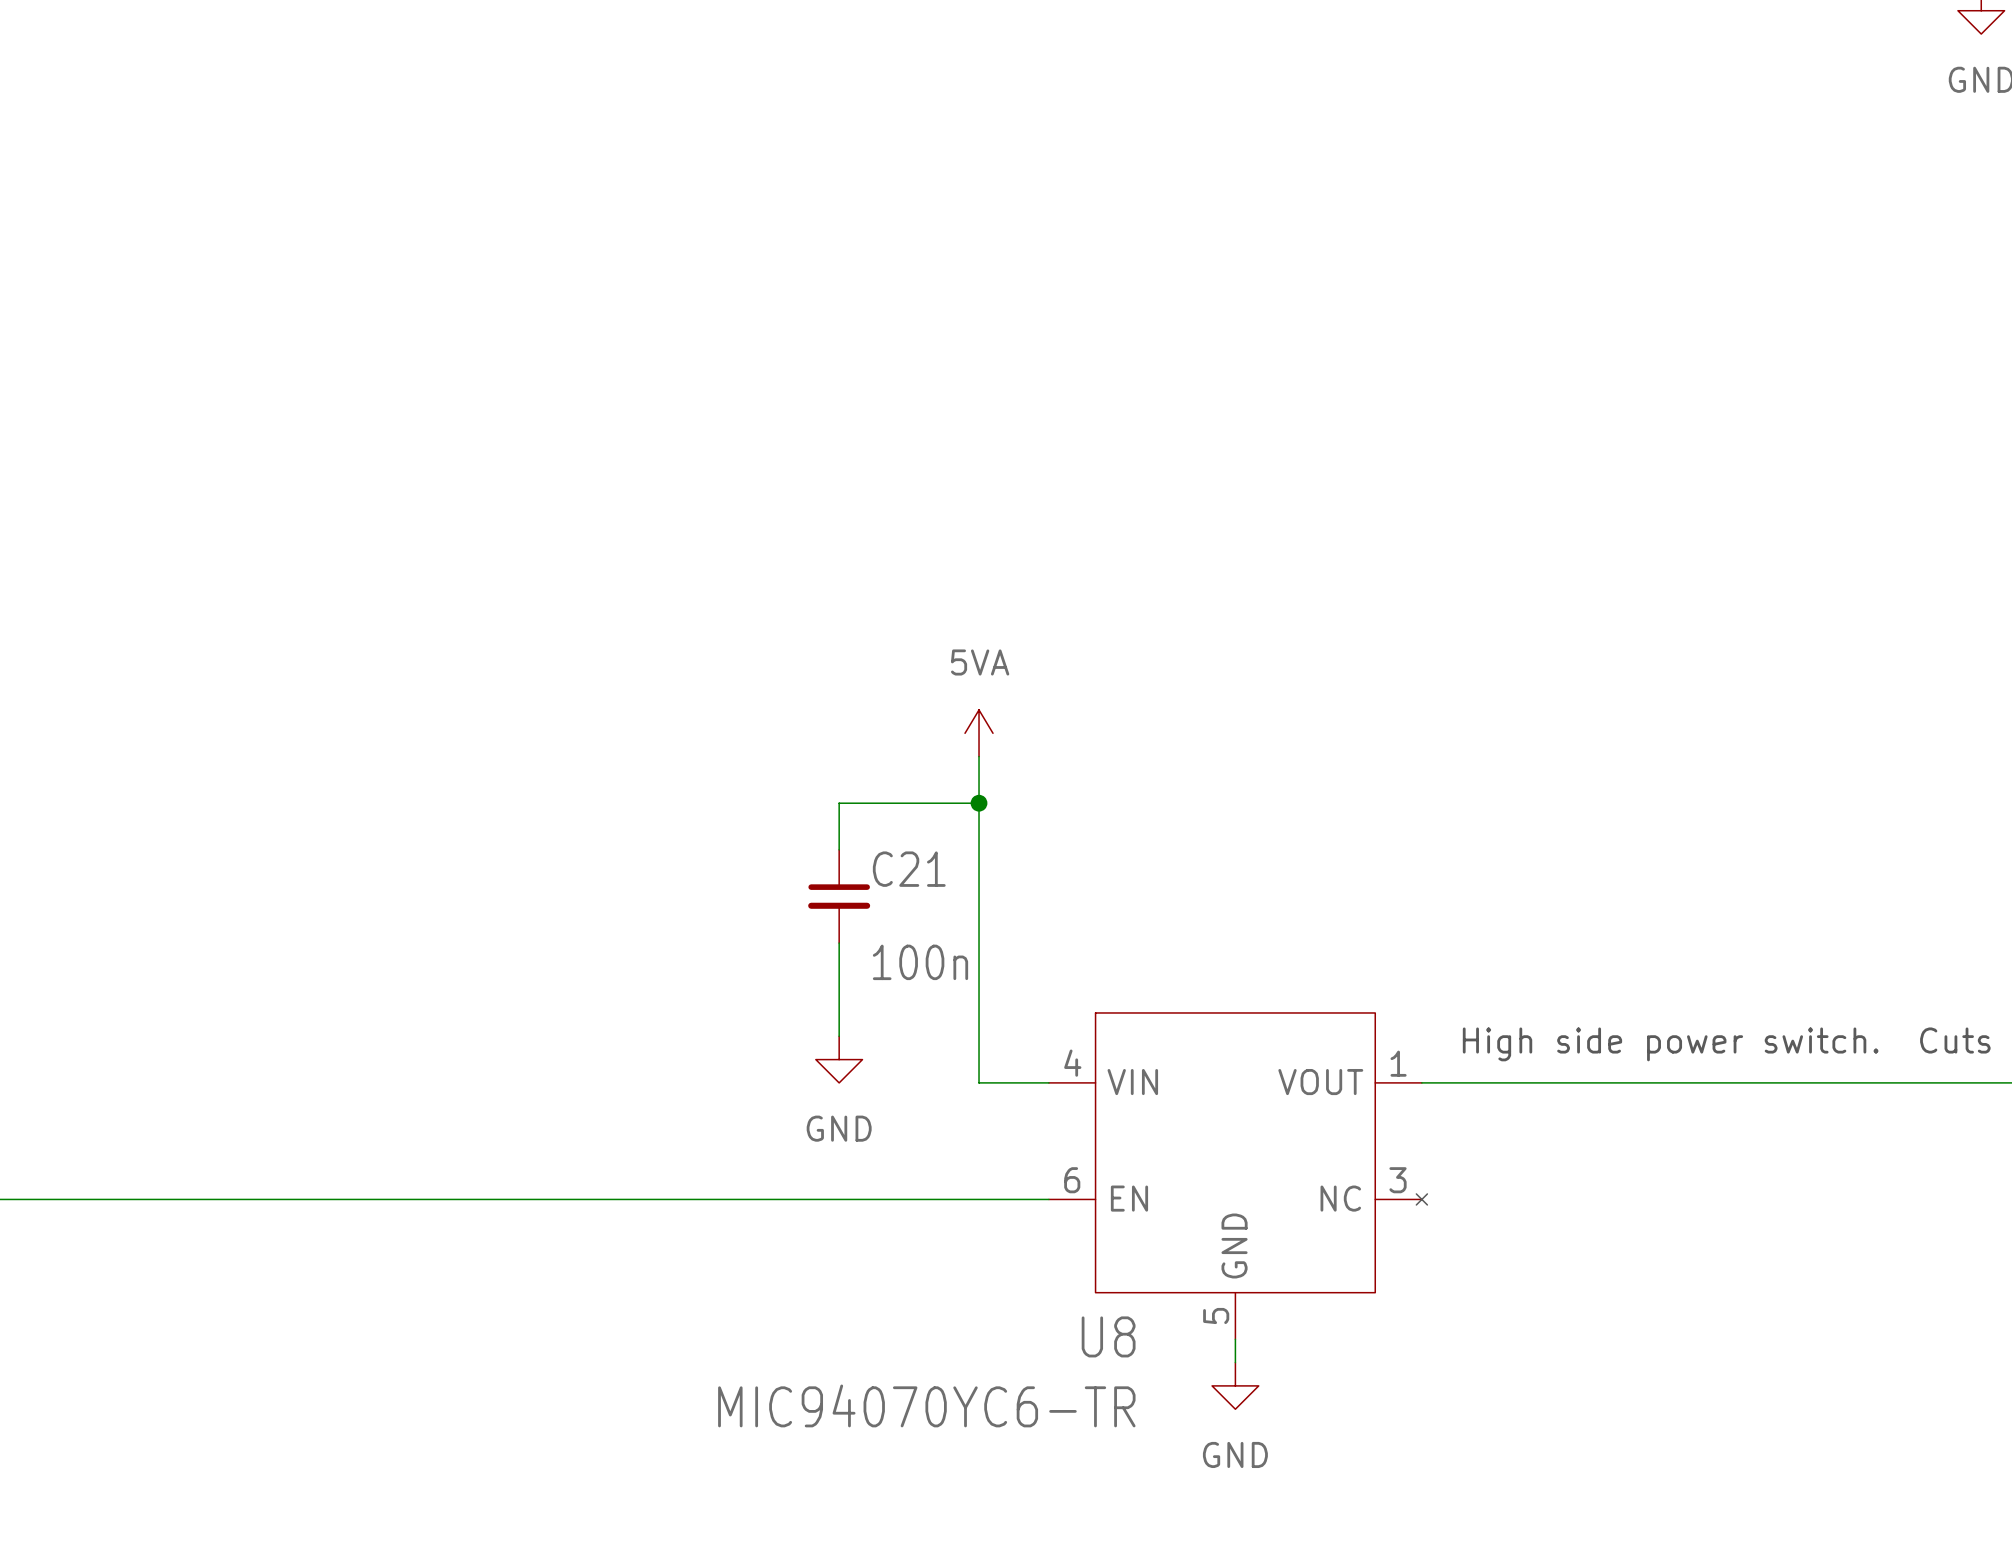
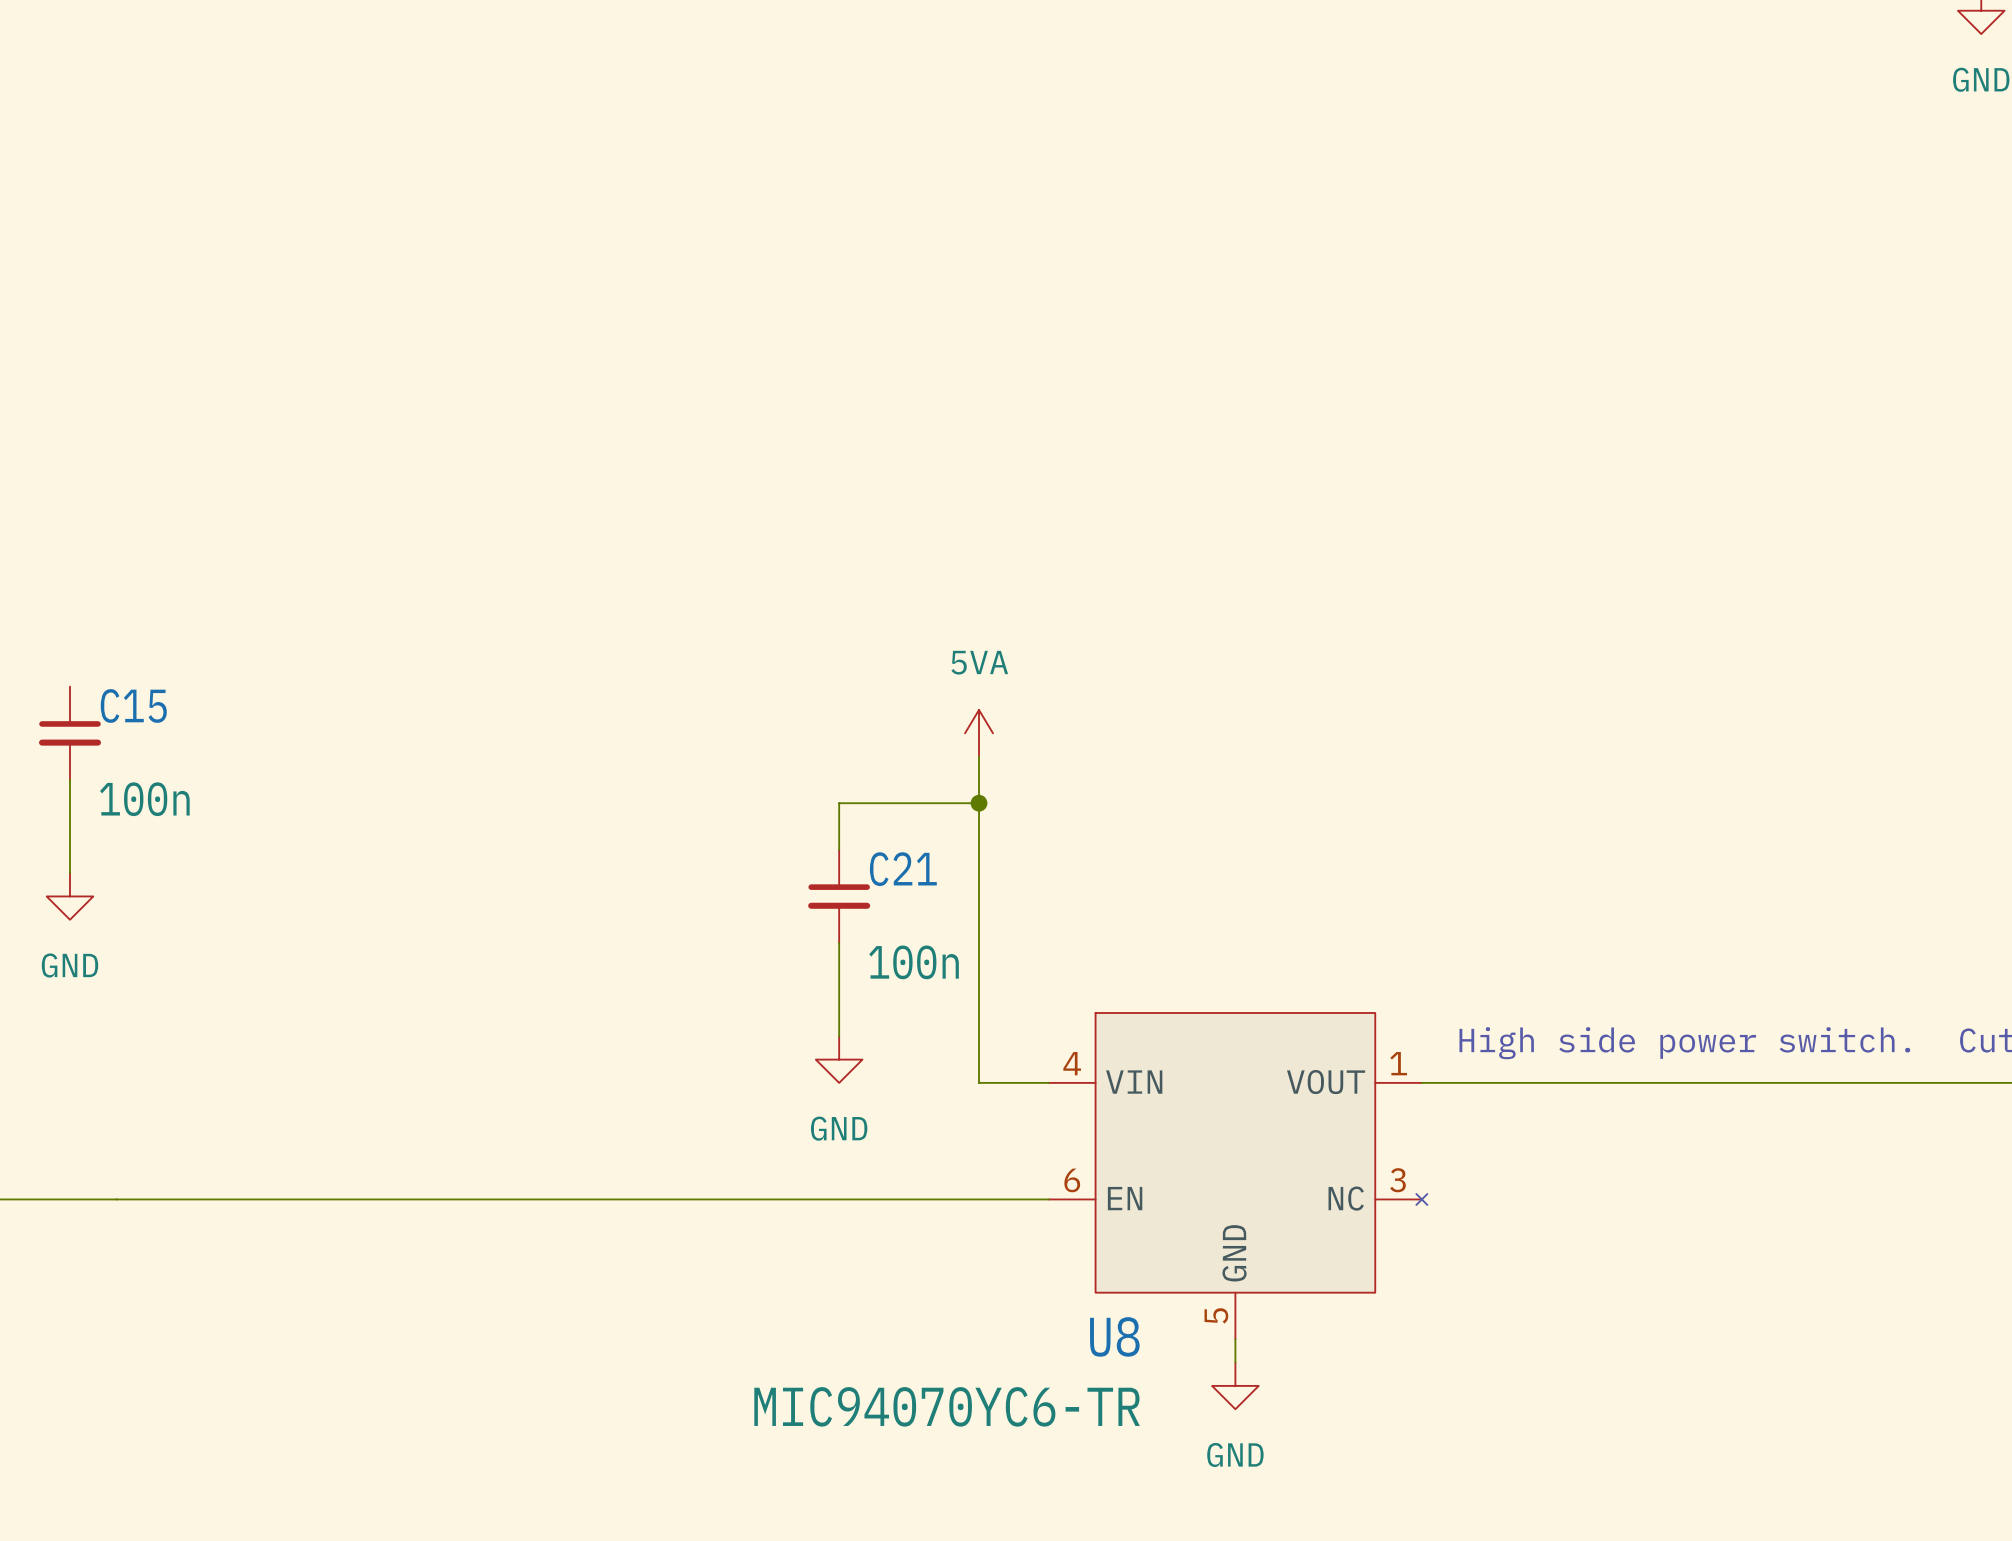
C15: none -> 100n (69, 733)
wire: none -> (69, 779) (69, 873)
power symbol: none -> GND (69, 896)

